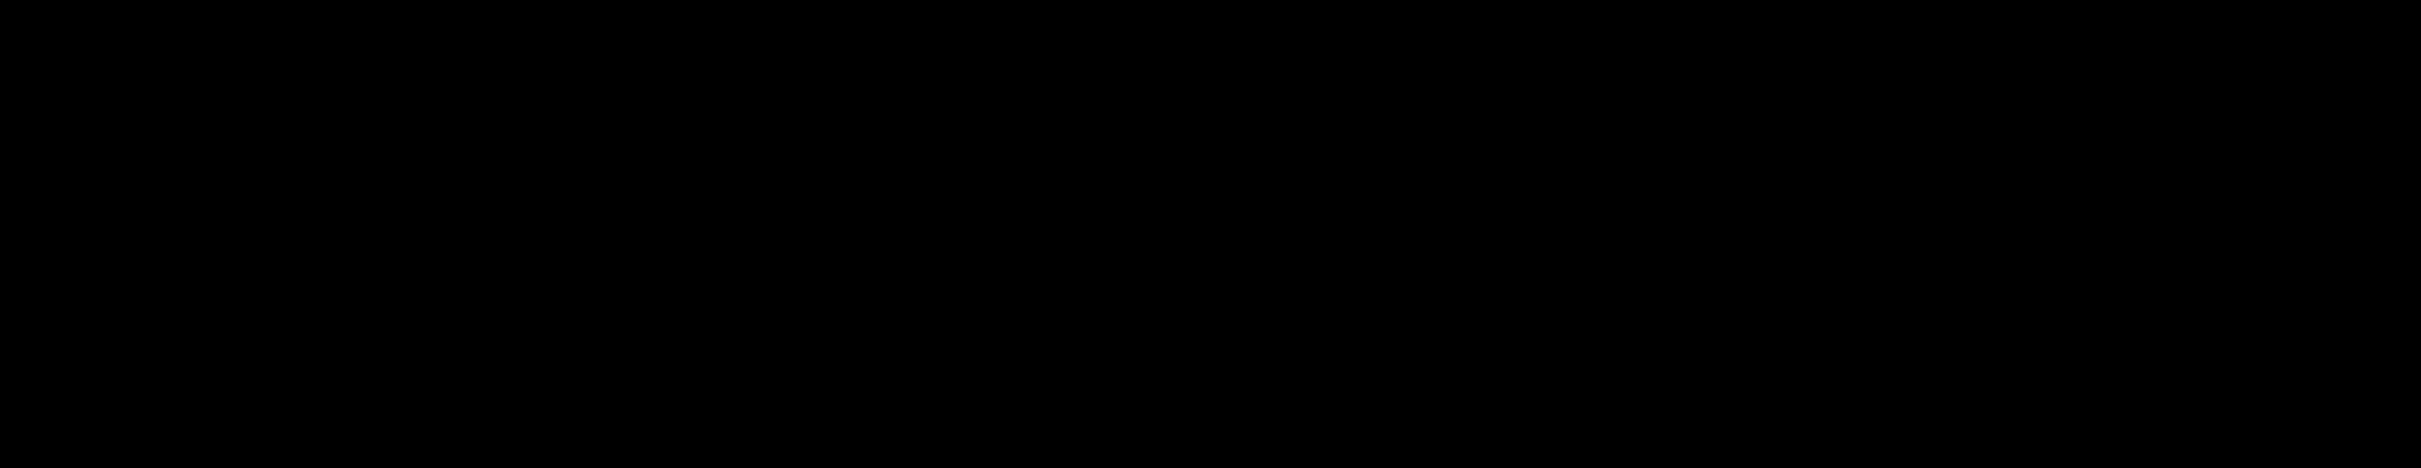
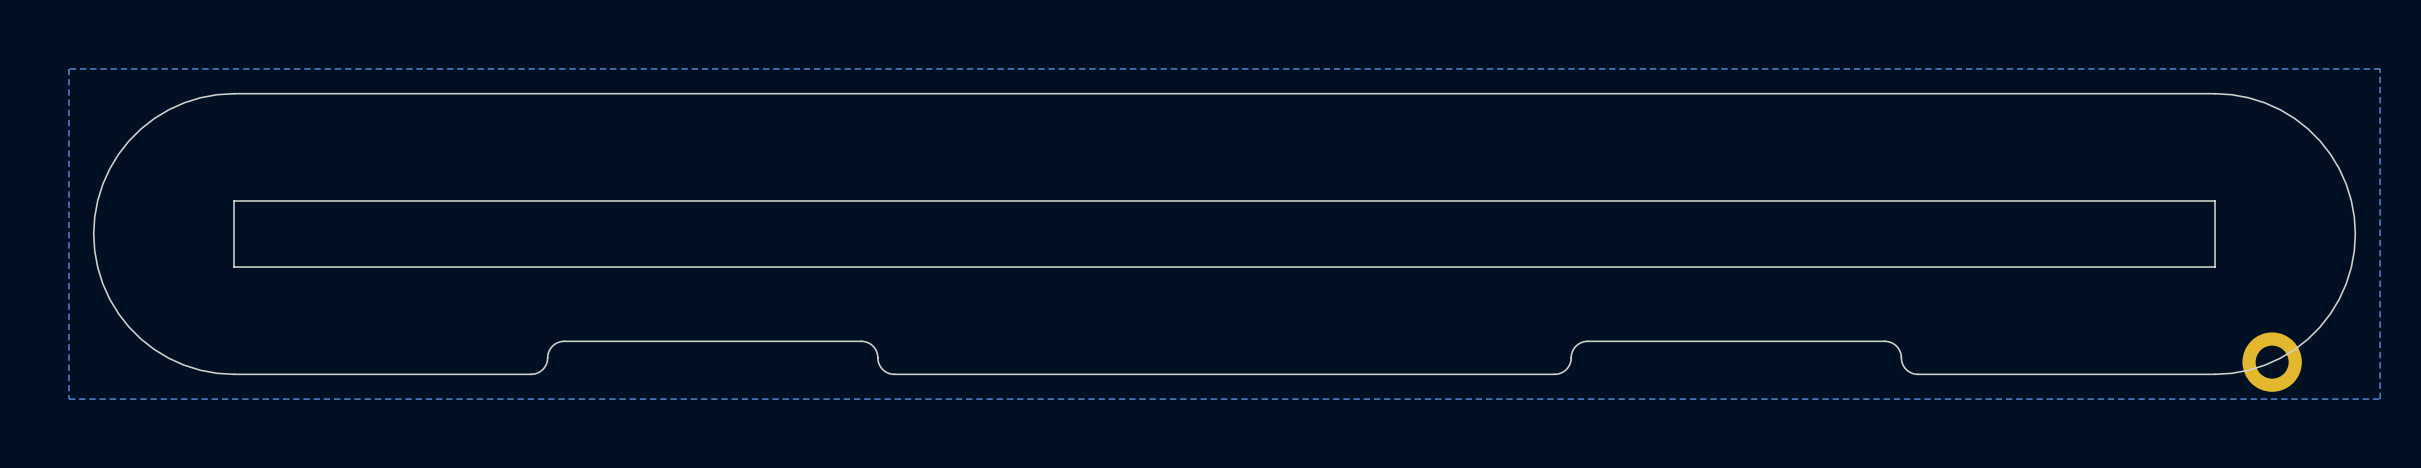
zone outline: none -> (2380, 68) (2380, 399) (68, 399) (68, 68) (2380, 68)
board edge: none -> (2215, 93) (217, 94) (184, 102) (168, 109) (154, 118) (128, 140) (109, 168) (97, 200) (94, 217) (94, 250) (102, 283) (109, 299) (128, 327) (140, 339) (168, 358) (184, 365) (217, 373) (234, 374) (533, 374) (544, 367) (552, 346) (564, 341) (863, 341) (874, 347) (882, 369) (894, 374) (1554, 374) (1566, 369) (1574, 347) (1579, 343) (1587, 341) (1887, 341) (1897, 347) (1906, 369) (1917, 374) (2231, 373) (2264, 365) (2280, 358) (2308, 339) (2320, 327) (2339, 299) (2346, 283) (2354, 250) (2355, 234) (2354, 217) (2346, 184) (2339, 168) (2320, 140) (2308, 128) (2280, 109) (2248, 97) (2215, 93)
board edge: none -> (2215, 201) (234, 201) (234, 267) (2215, 267) (2215, 201)
part: none -> (2272, 362)

